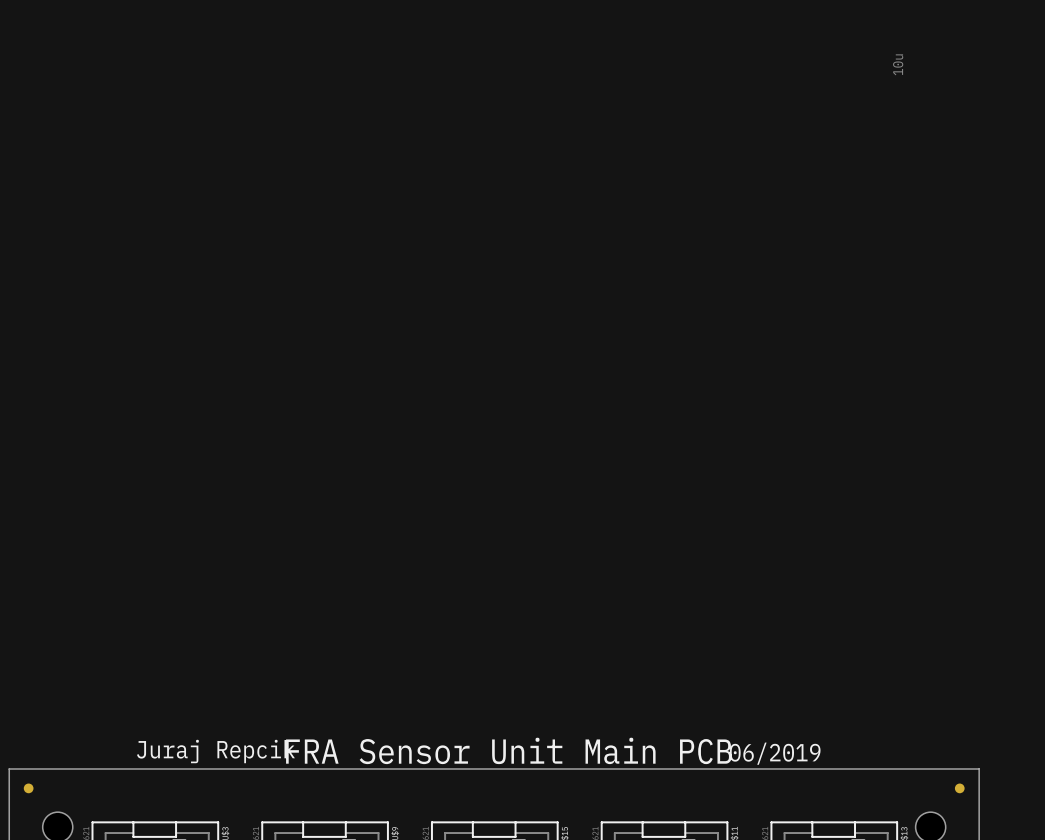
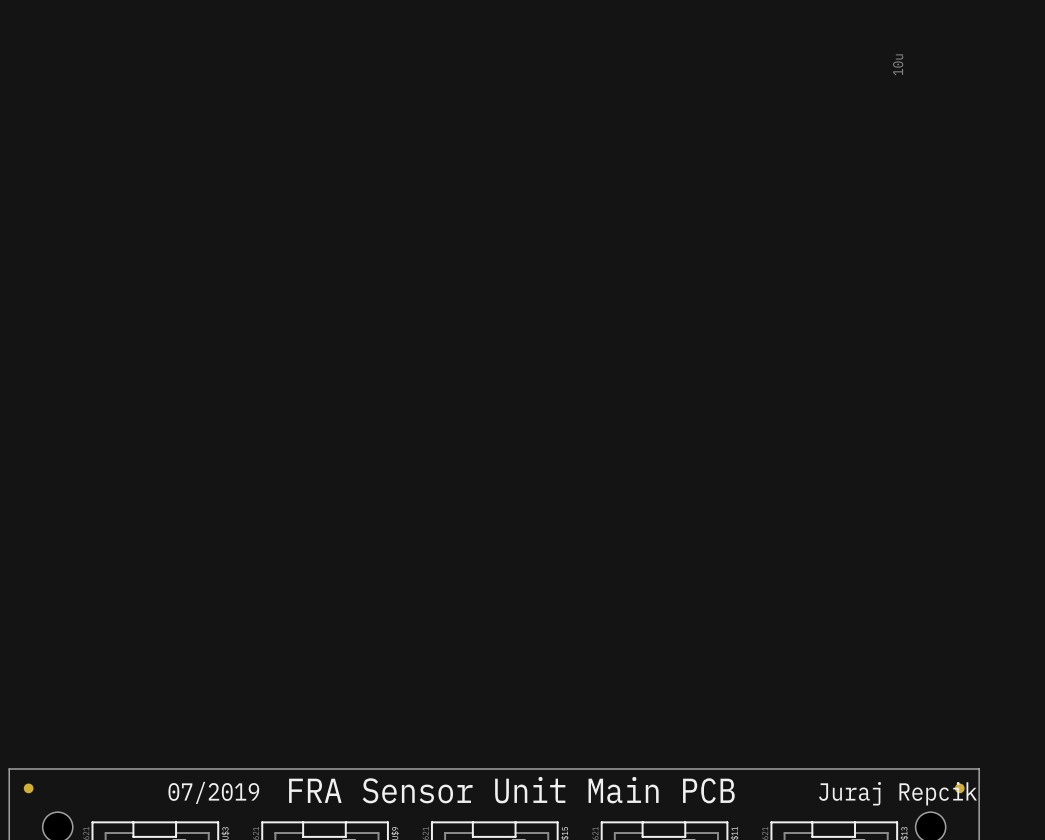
text position: FRA Sensor Unit Main PCB (508, 750) -> FRA Sensor Unit Main PCB (511, 790)
text: Juraj Repcik (215, 751) -> none
text: 06/2019 (775, 753) -> none
text: none -> 07/2019 (213, 792)
text: none -> Juraj Repcik (898, 793)

